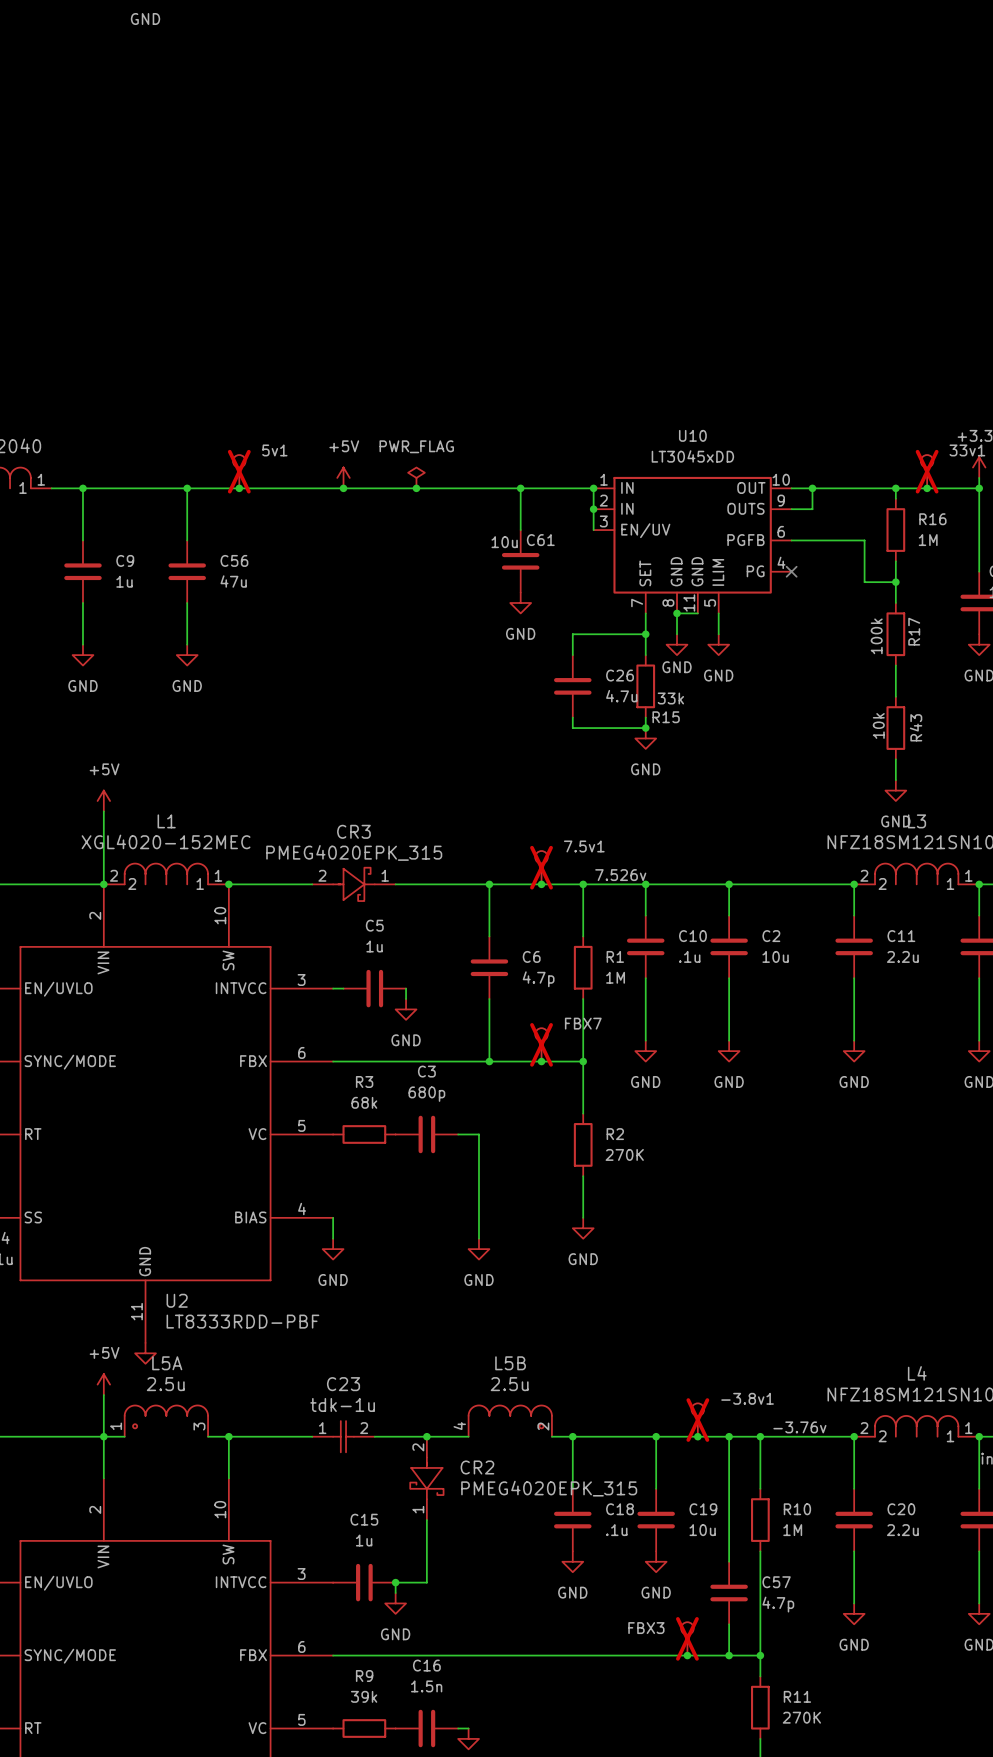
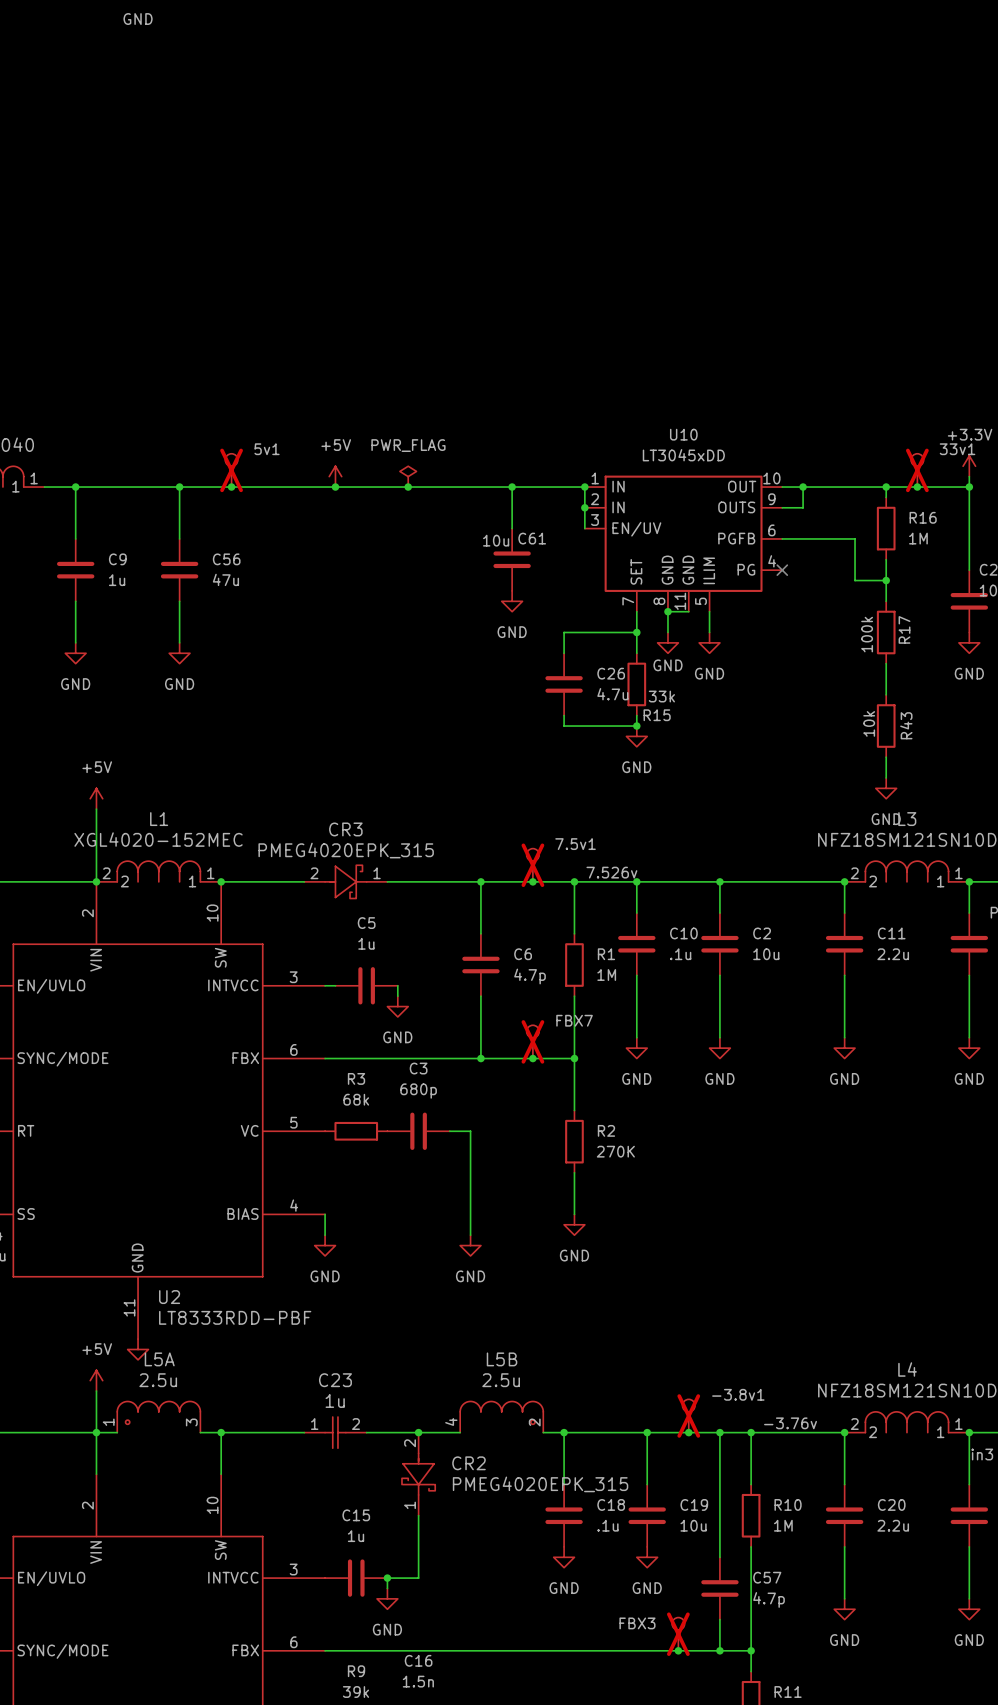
C23 value: tdk-1u (342, 1404) -> 1u (335, 1400)

